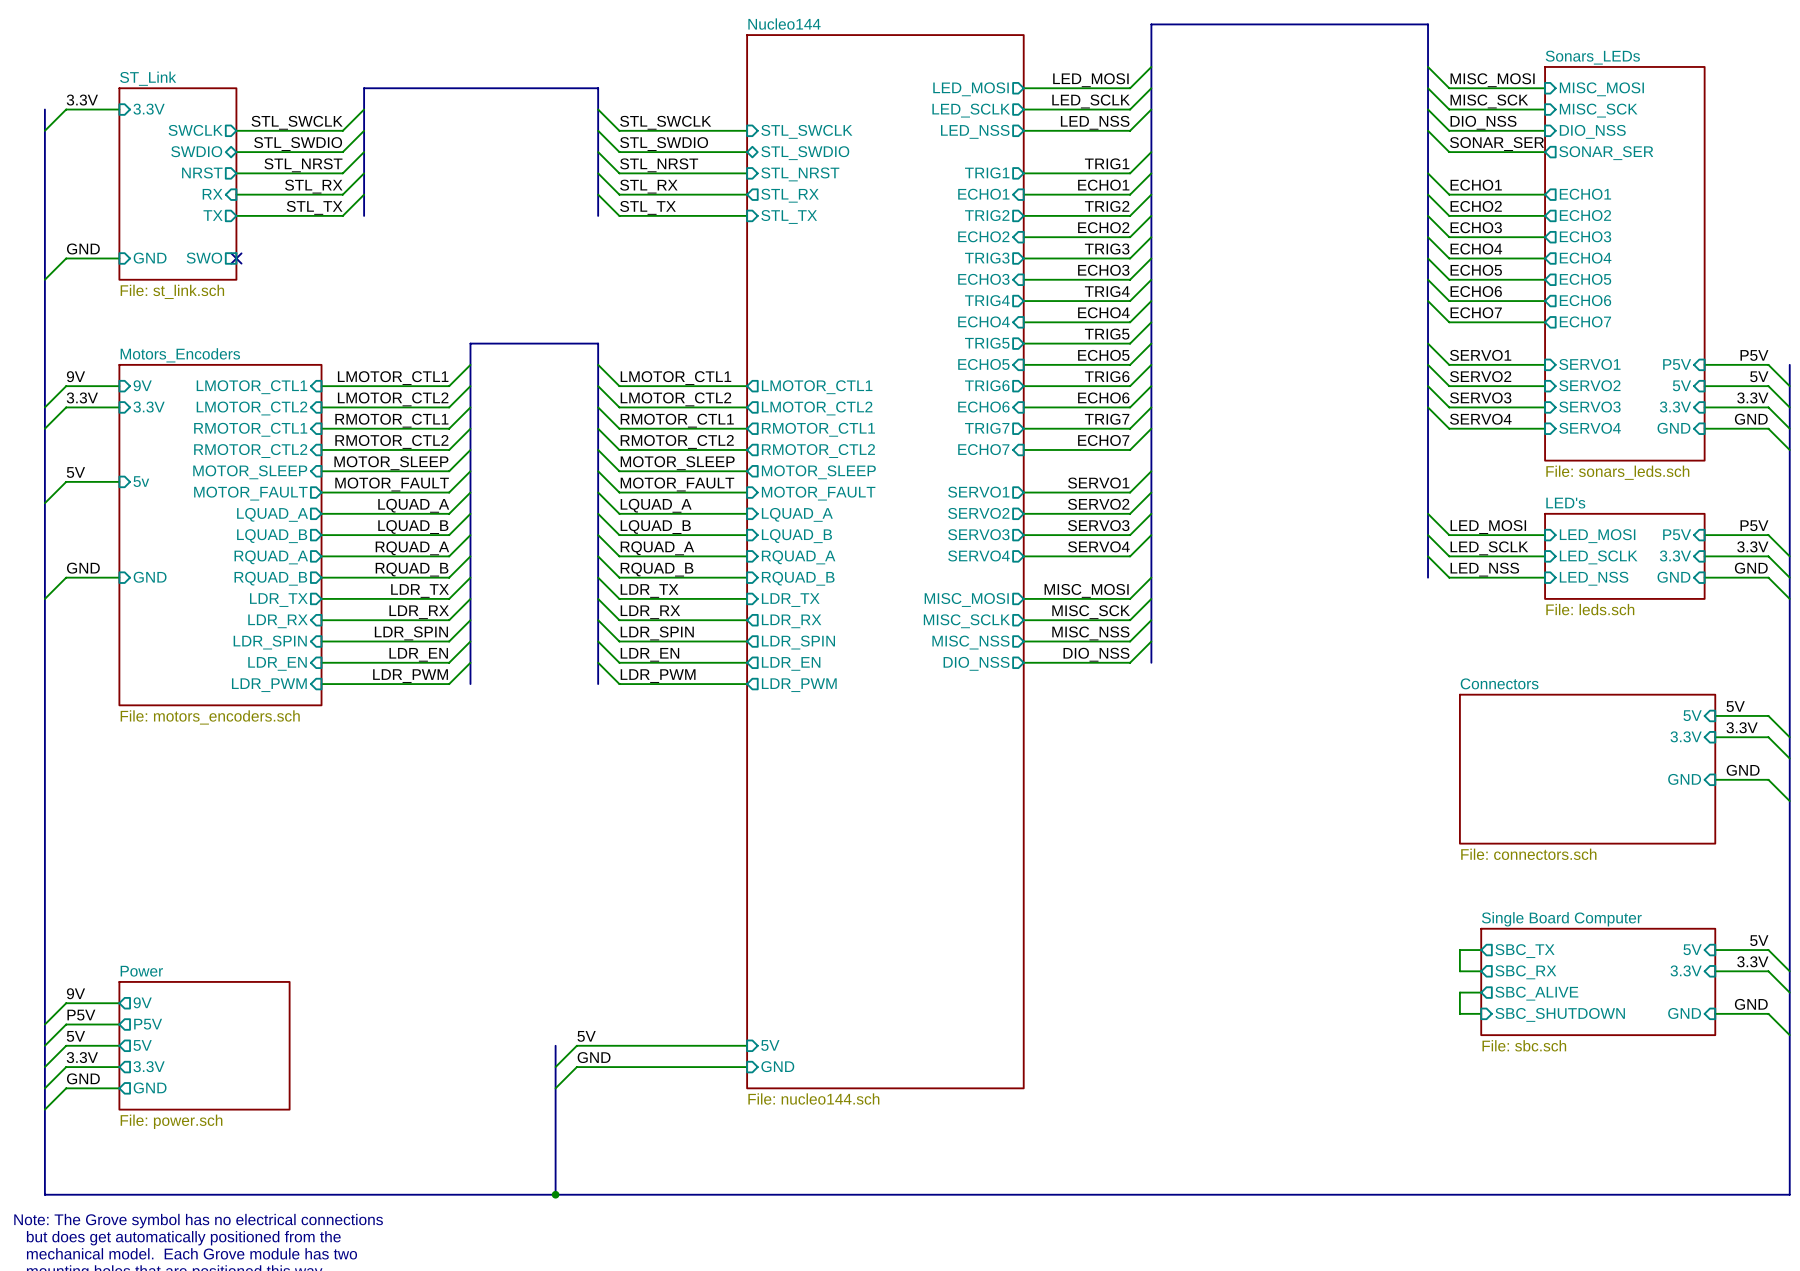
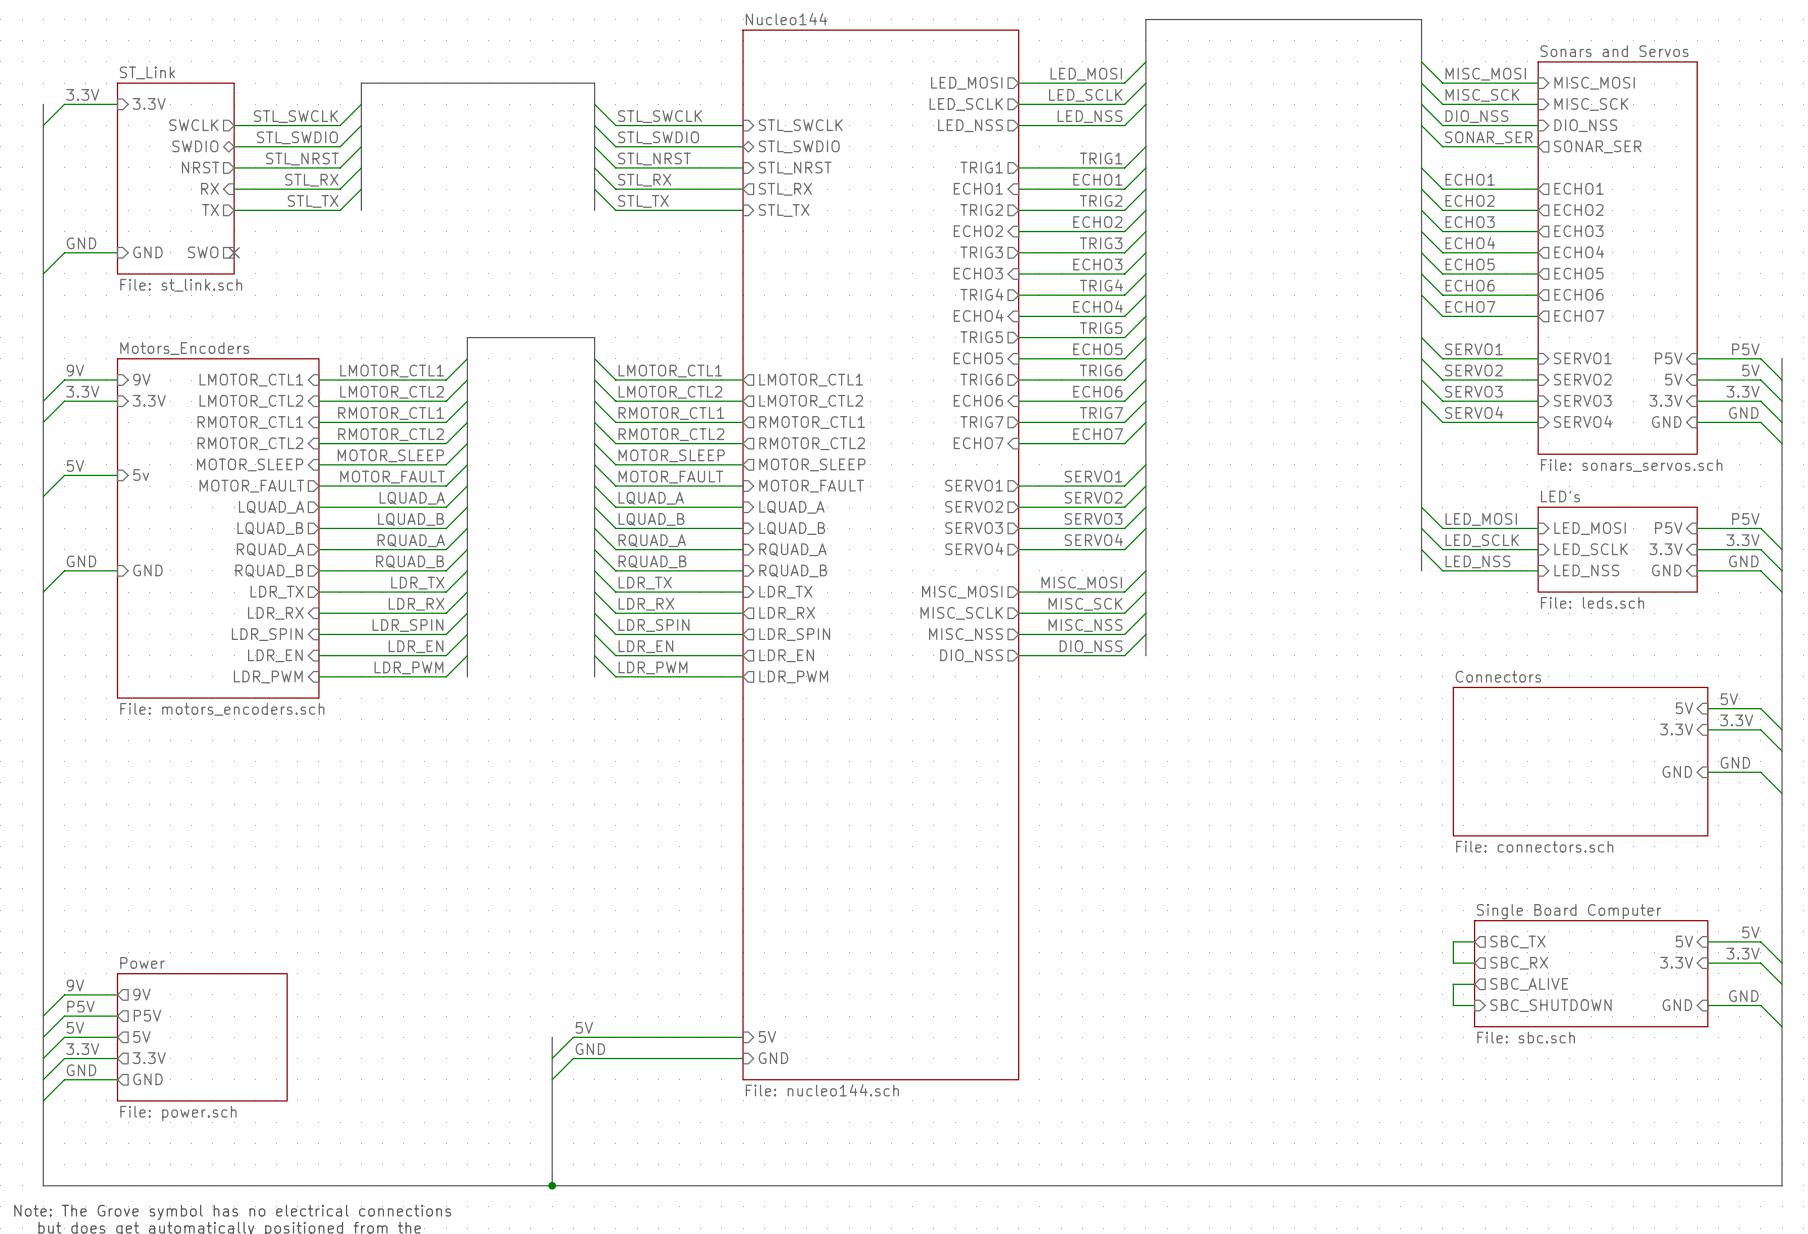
sheet Sonars_LEDs name: Sonars_LEDs (1592, 57) -> Sonars and Servos (1614, 51)
sheet Sonars_LEDs value: File: sonars_leds.sch (1617, 472) -> File: sonars_servos.sch (1631, 465)

